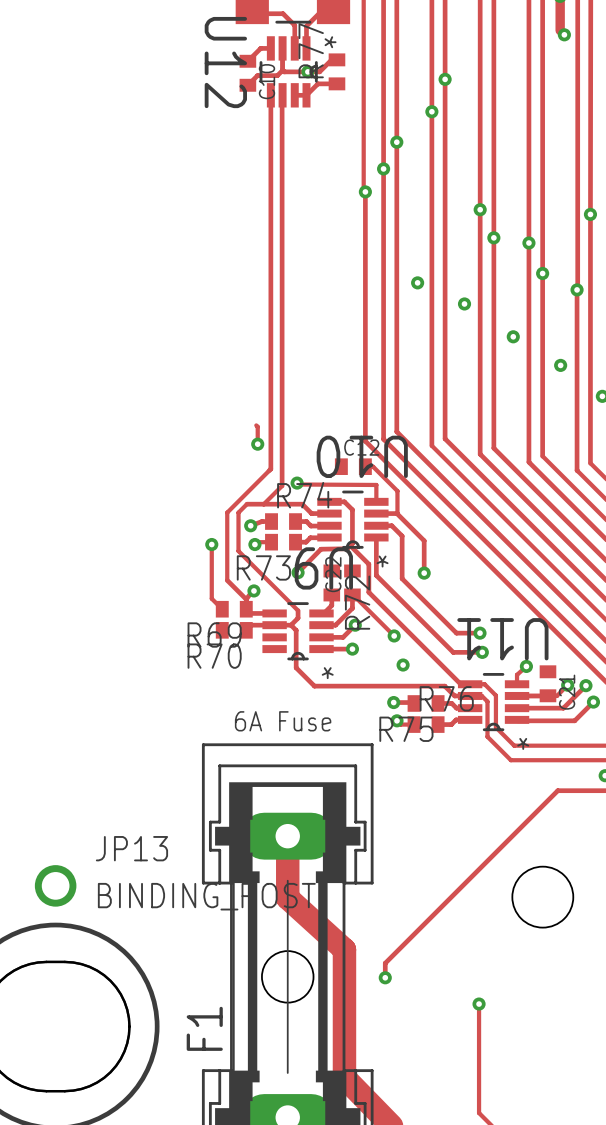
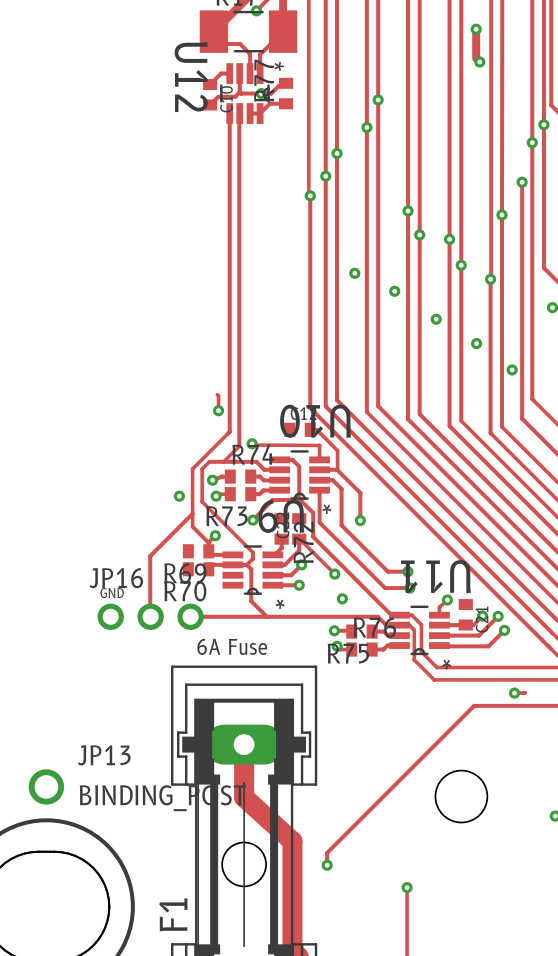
track: (211, 544) (211, 598) (222, 609) -> none
track: none -> (192, 513) (150, 556) (150, 616)
text: none -> GND (112, 593)
JP16: none -> (150, 616)
track: none -> (190, 616) (266, 616)

